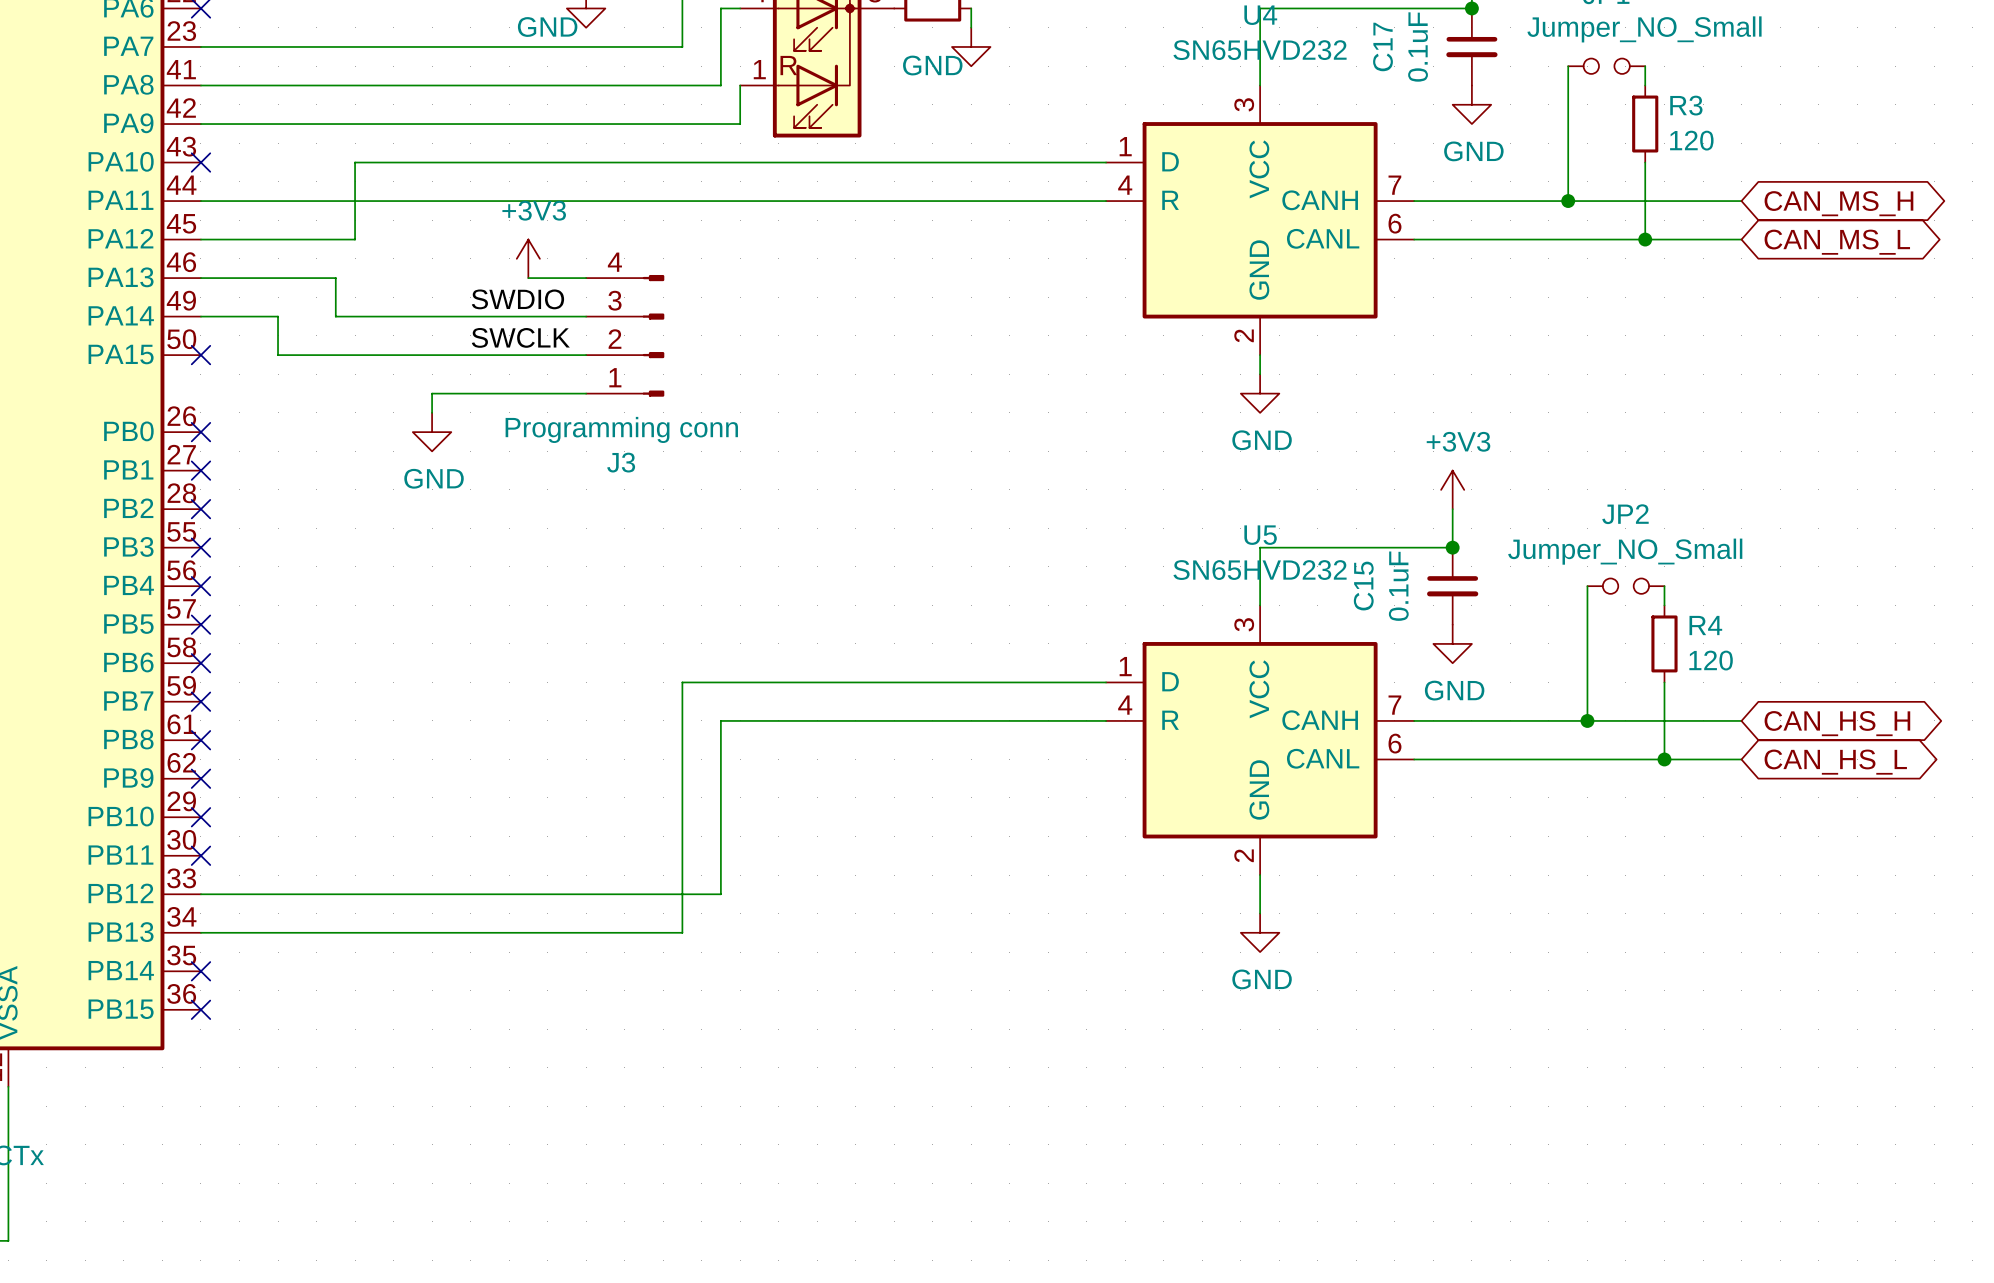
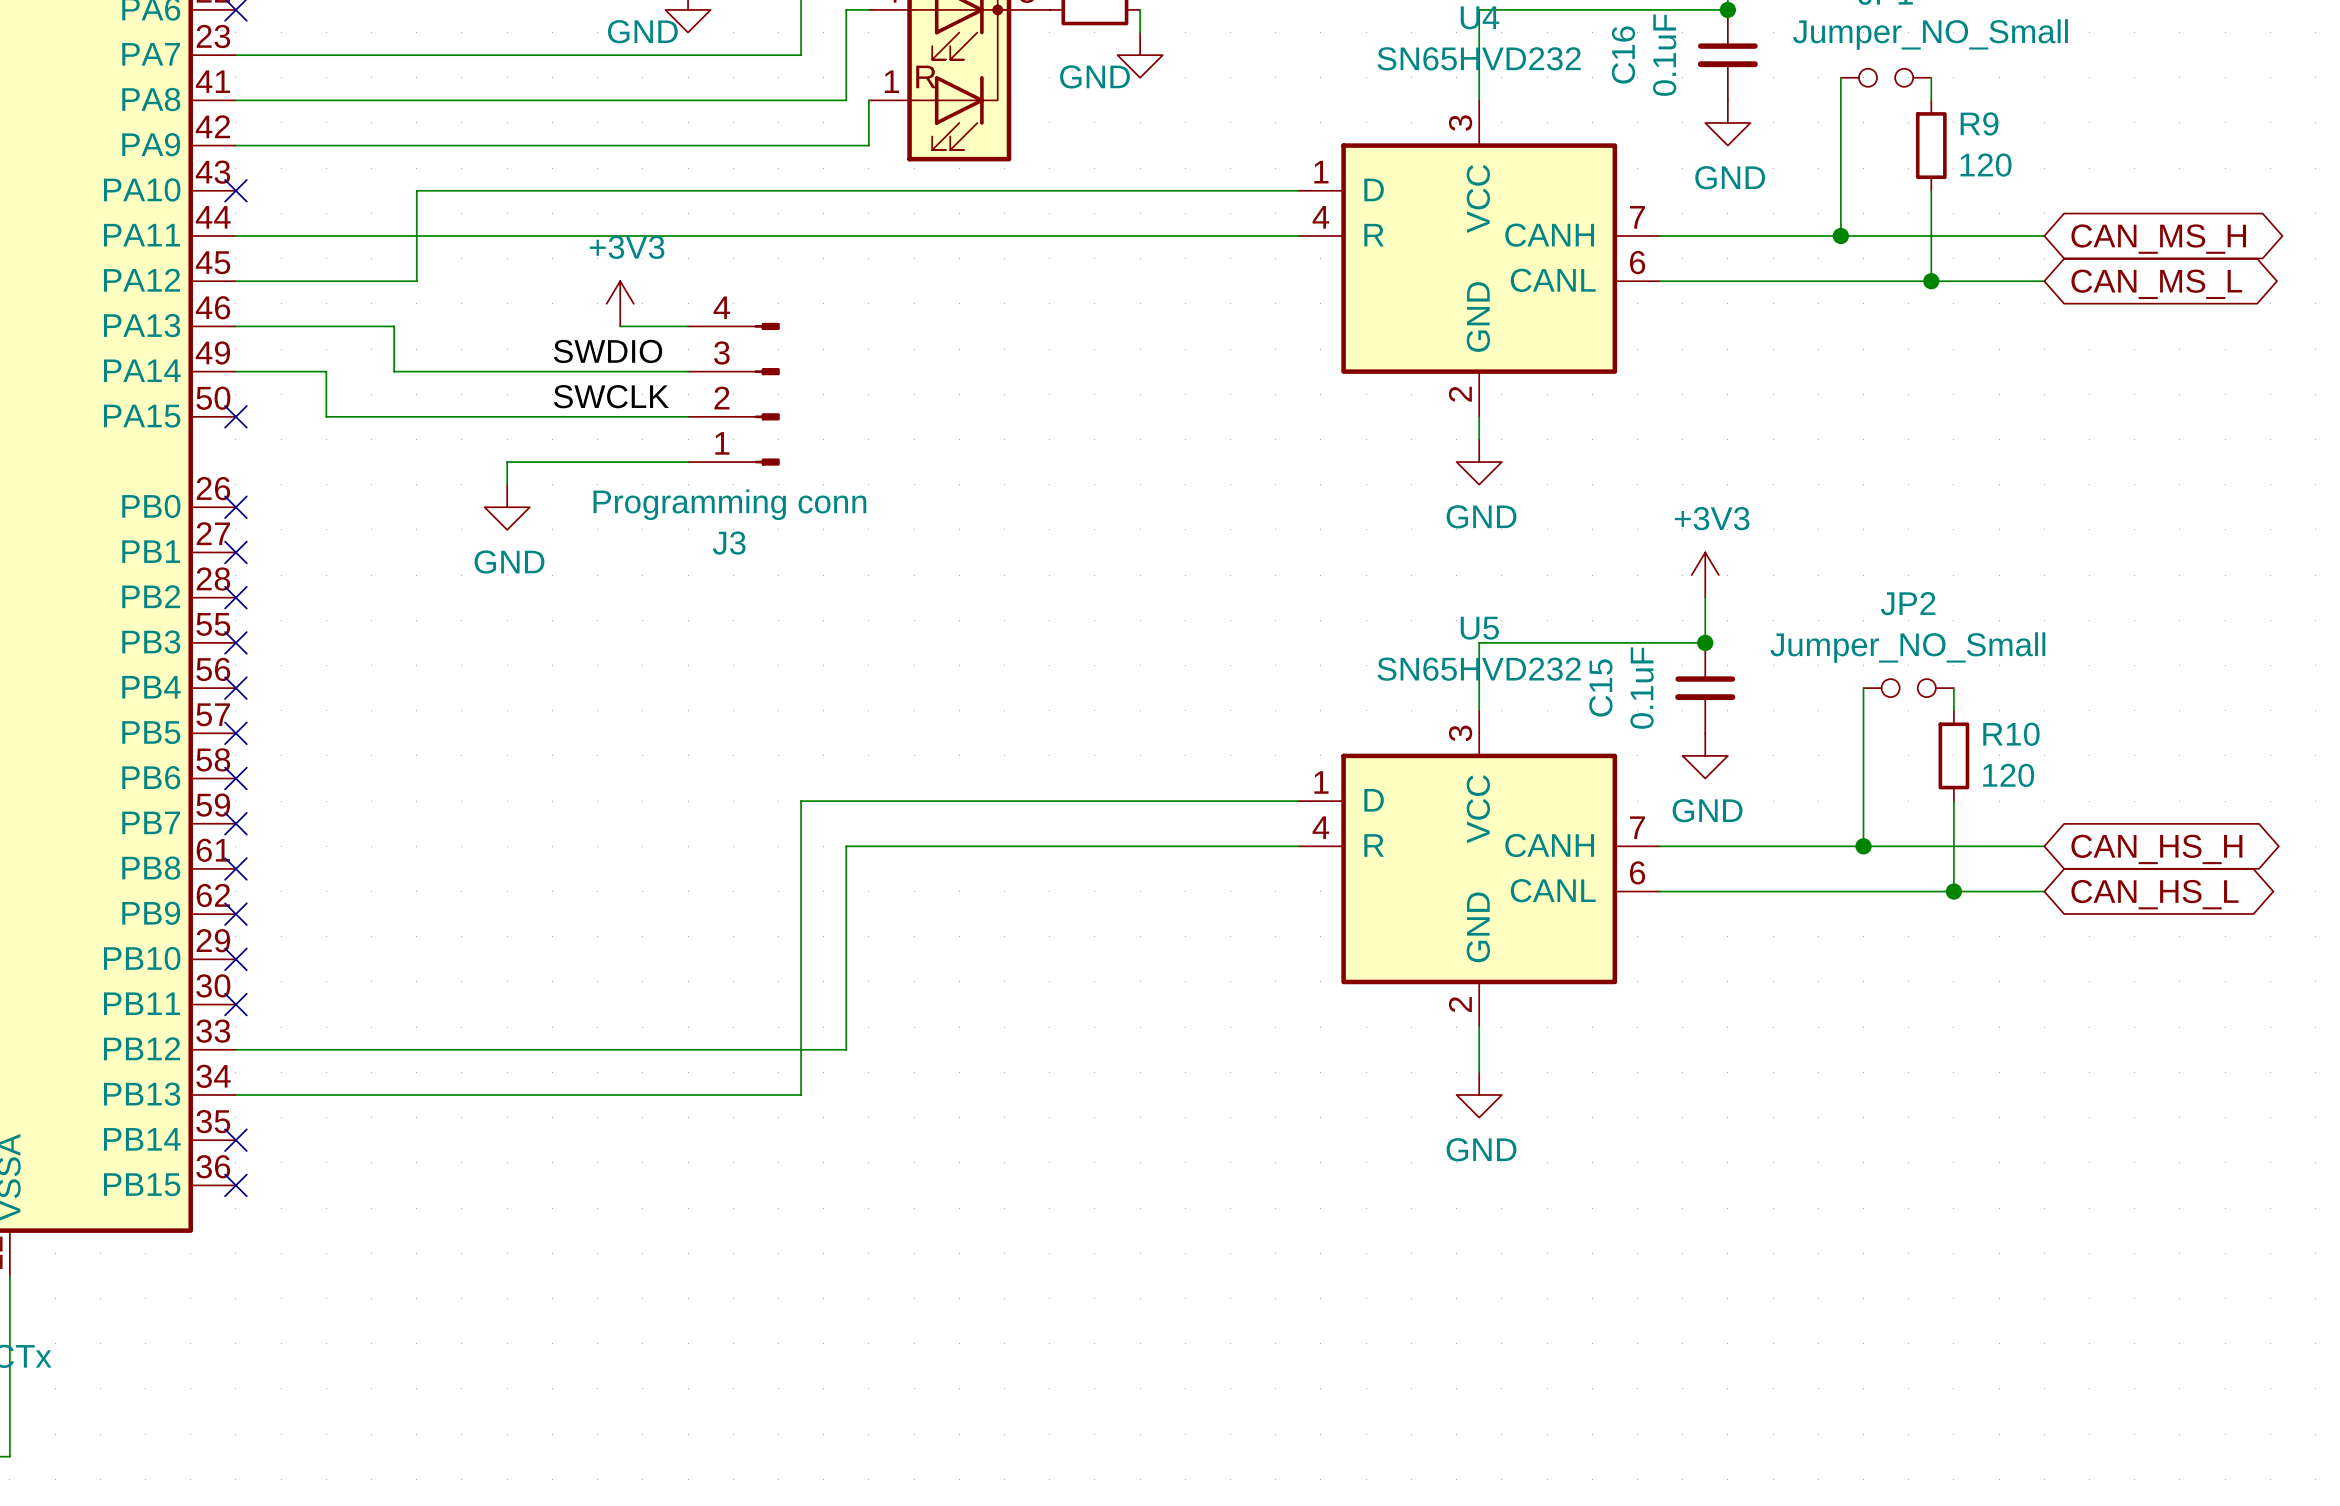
C17 name: C17 (1383, 46) -> C16 (1623, 55)
R3 name: R3 (1686, 105) -> R9 (1979, 123)
R4 name: R4 (1705, 625) -> R10 (2011, 734)

